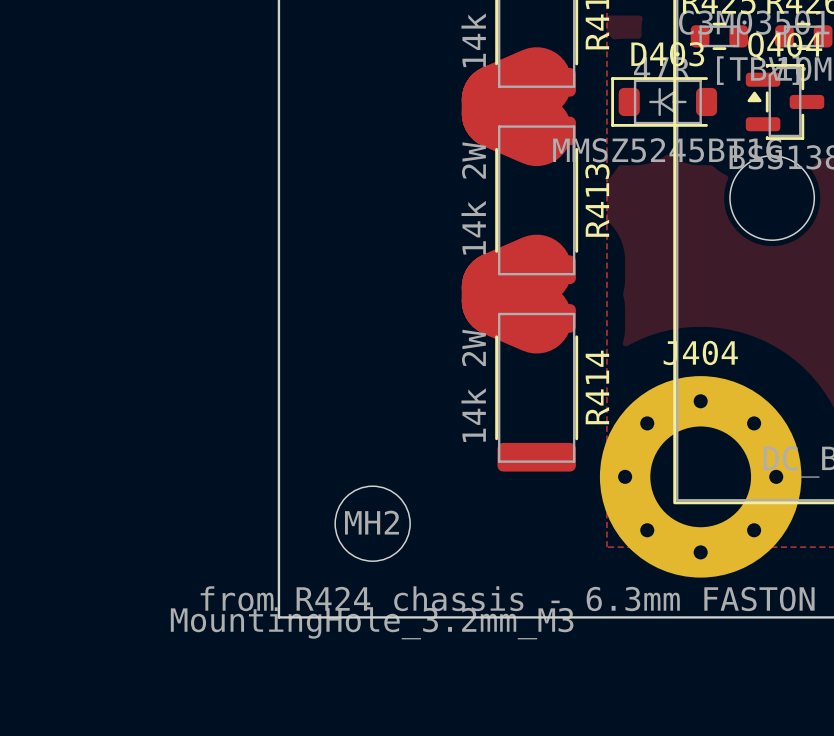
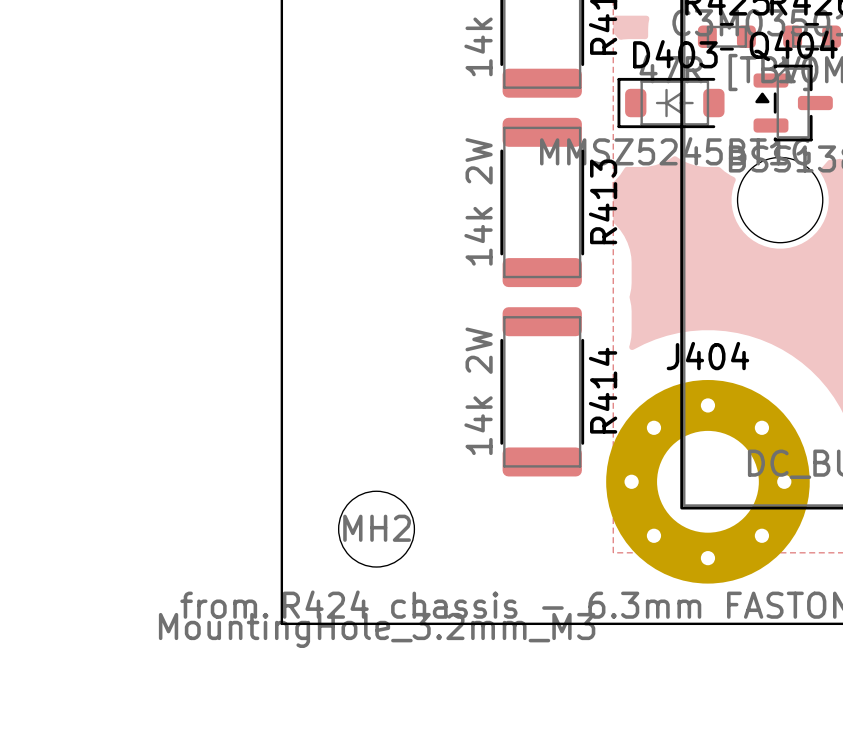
top track: (536, 82) (496, 99) (496, 113) (536, 130) -> none
top track: (536, 269) (496, 287) (496, 301) (536, 318) -> none

